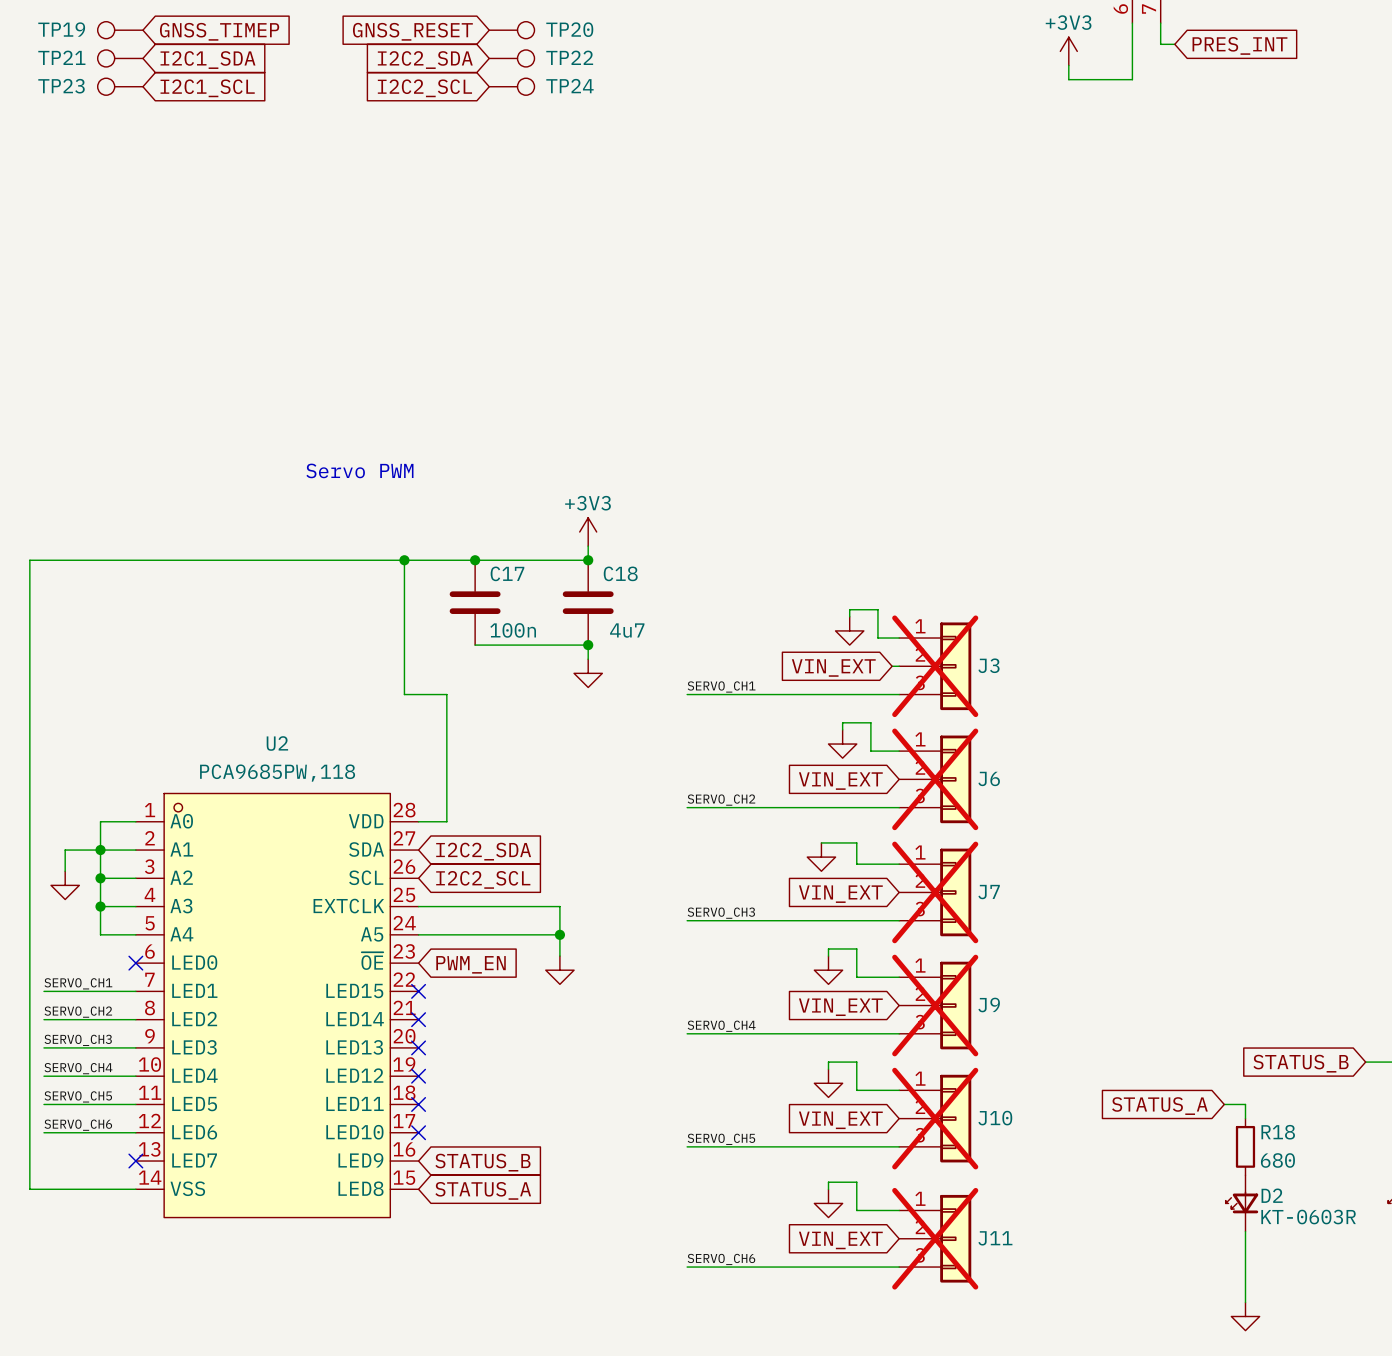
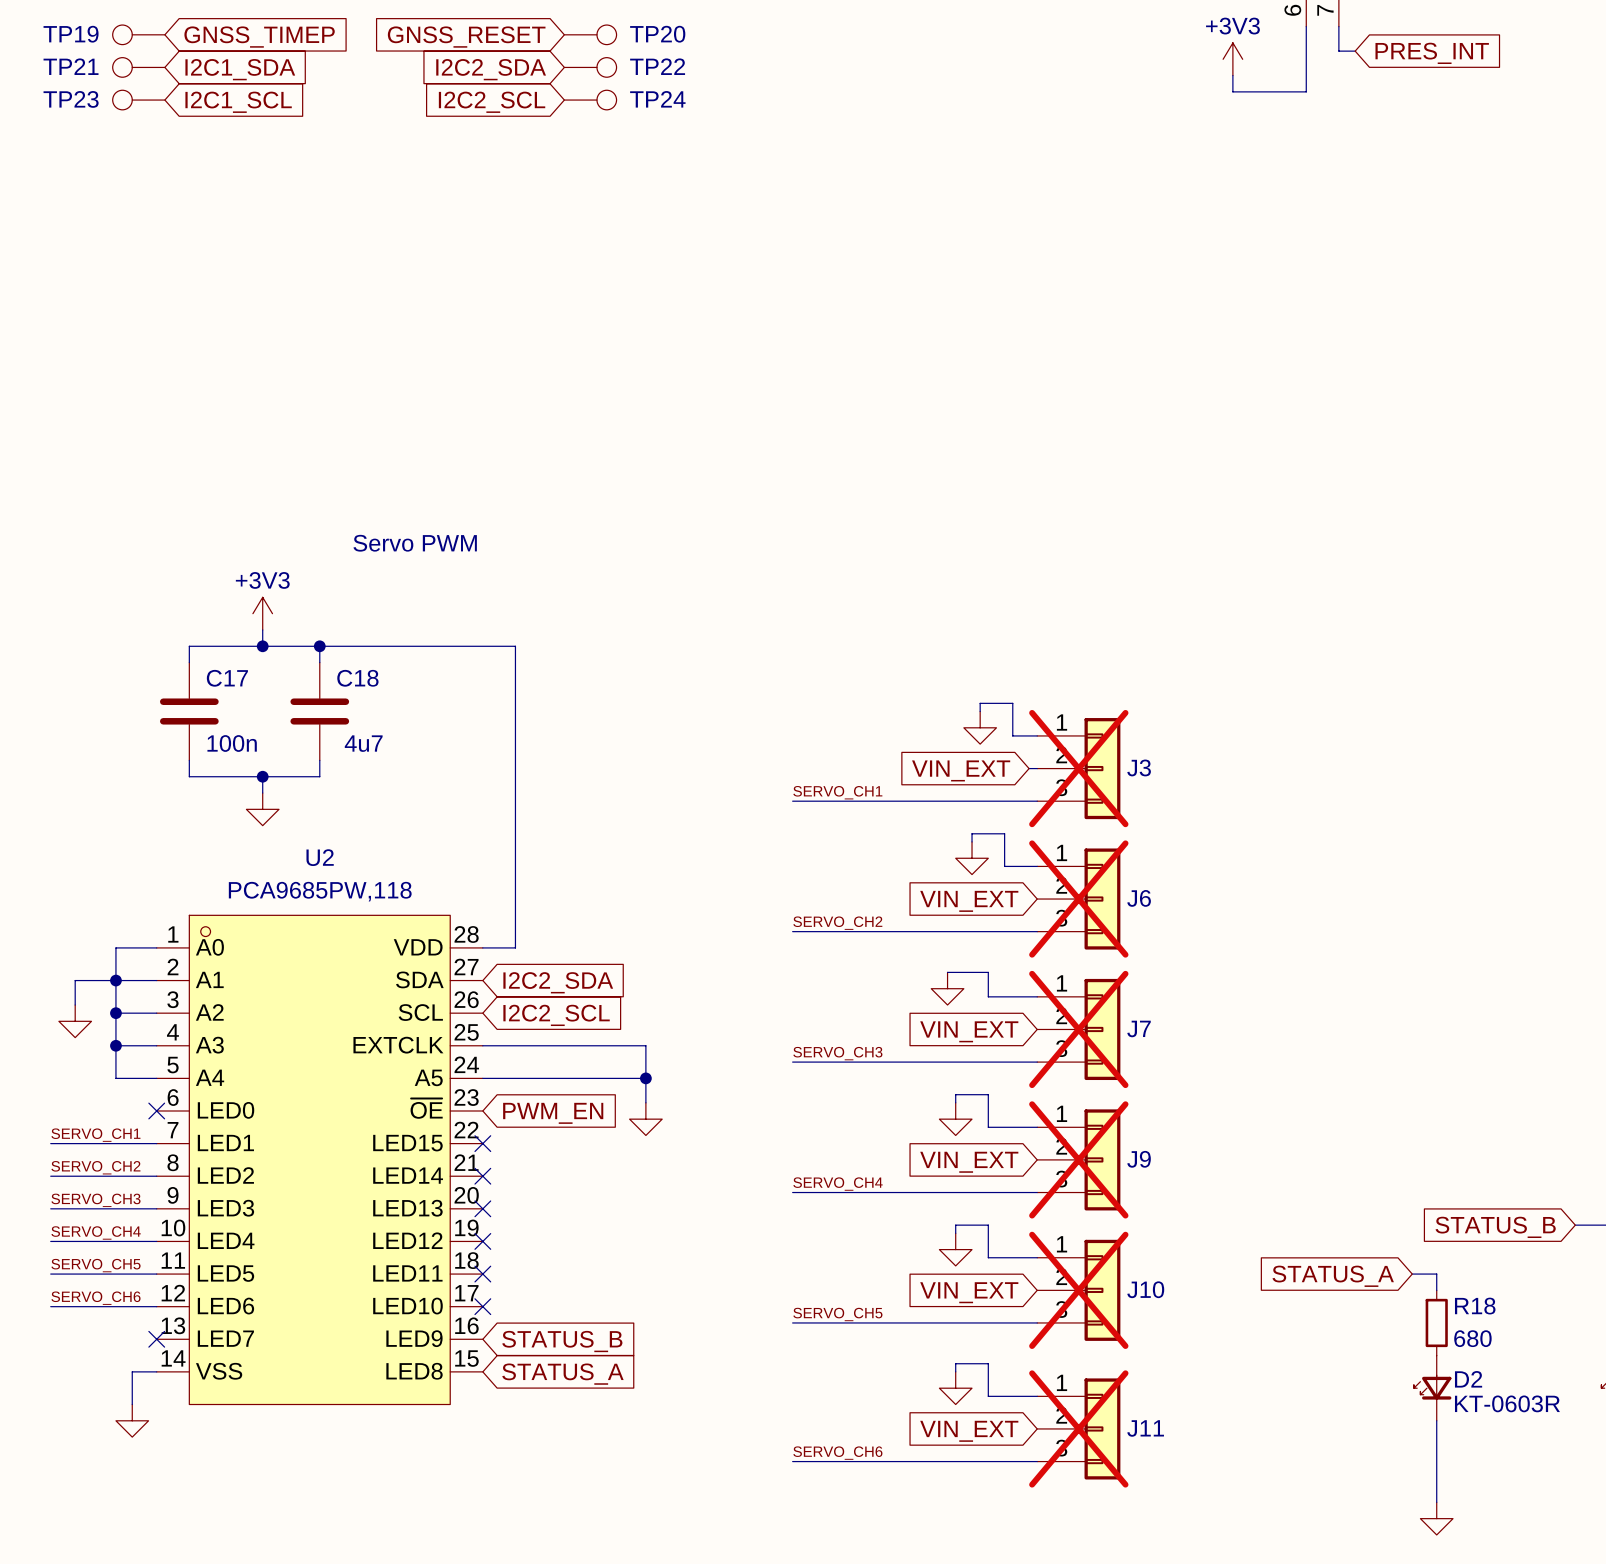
power symbol: none -> +3V3 (262, 613)
power symbol: +3V3 (588, 531) -> none
wire: none -> (262, 629) (262, 646)
wire: (588, 546) (588, 560) (446, 560) -> none
wire: (164, 560) (29, 560) (29, 1189) (114, 1189) -> (189, 646) (189, 662)
junction: none -> (262, 646)
wire: none -> (319, 646) (319, 662)
junction: none -> (319, 646)
wire: (404, 560) (404, 694) (446, 694) -> (515, 646) (515, 801)
junction: (404, 560) -> none
junction: (475, 560) -> none
junction: (588, 560) -> none
C17 position: (475, 602) -> (189, 711)
C18 position: (588, 602) -> (319, 711)
wire: (475, 645) (588, 645) (588, 659) -> none
junction: (588, 645) -> none
wire: none -> (189, 760) (189, 776) (319, 776) (319, 760)
wire: none -> (262, 776) (262, 793)
junction: none -> (262, 776)
power symbol: (588, 673) -> none
power symbol: none -> (262, 809)
wire: none -> (132, 1371) (132, 1404)
power symbol: none -> (132, 1420)

